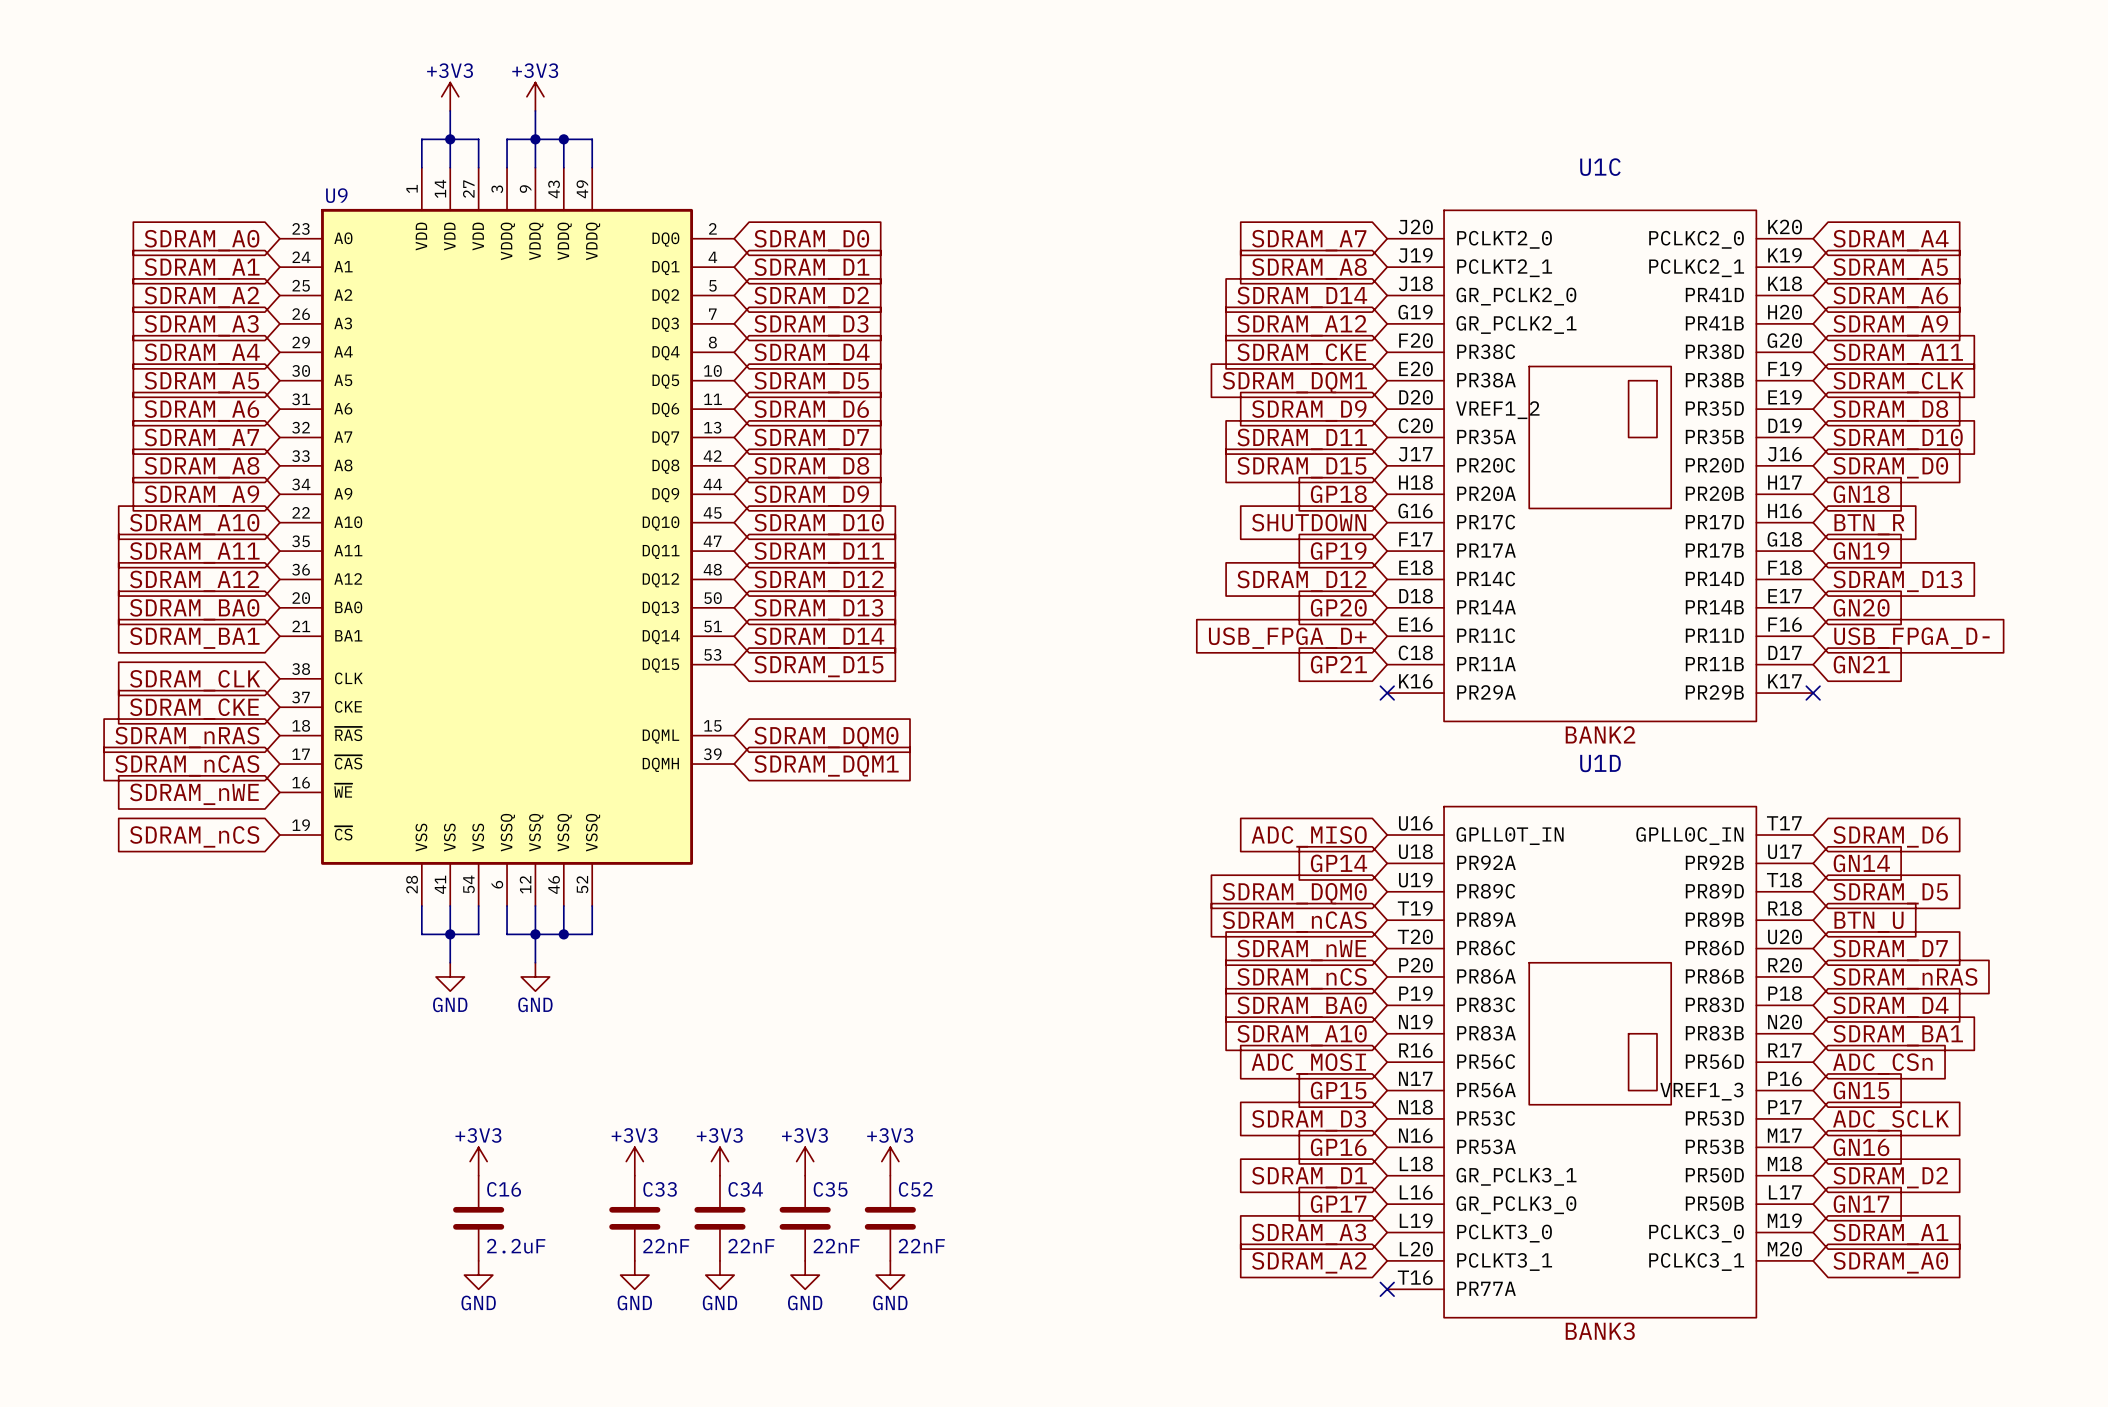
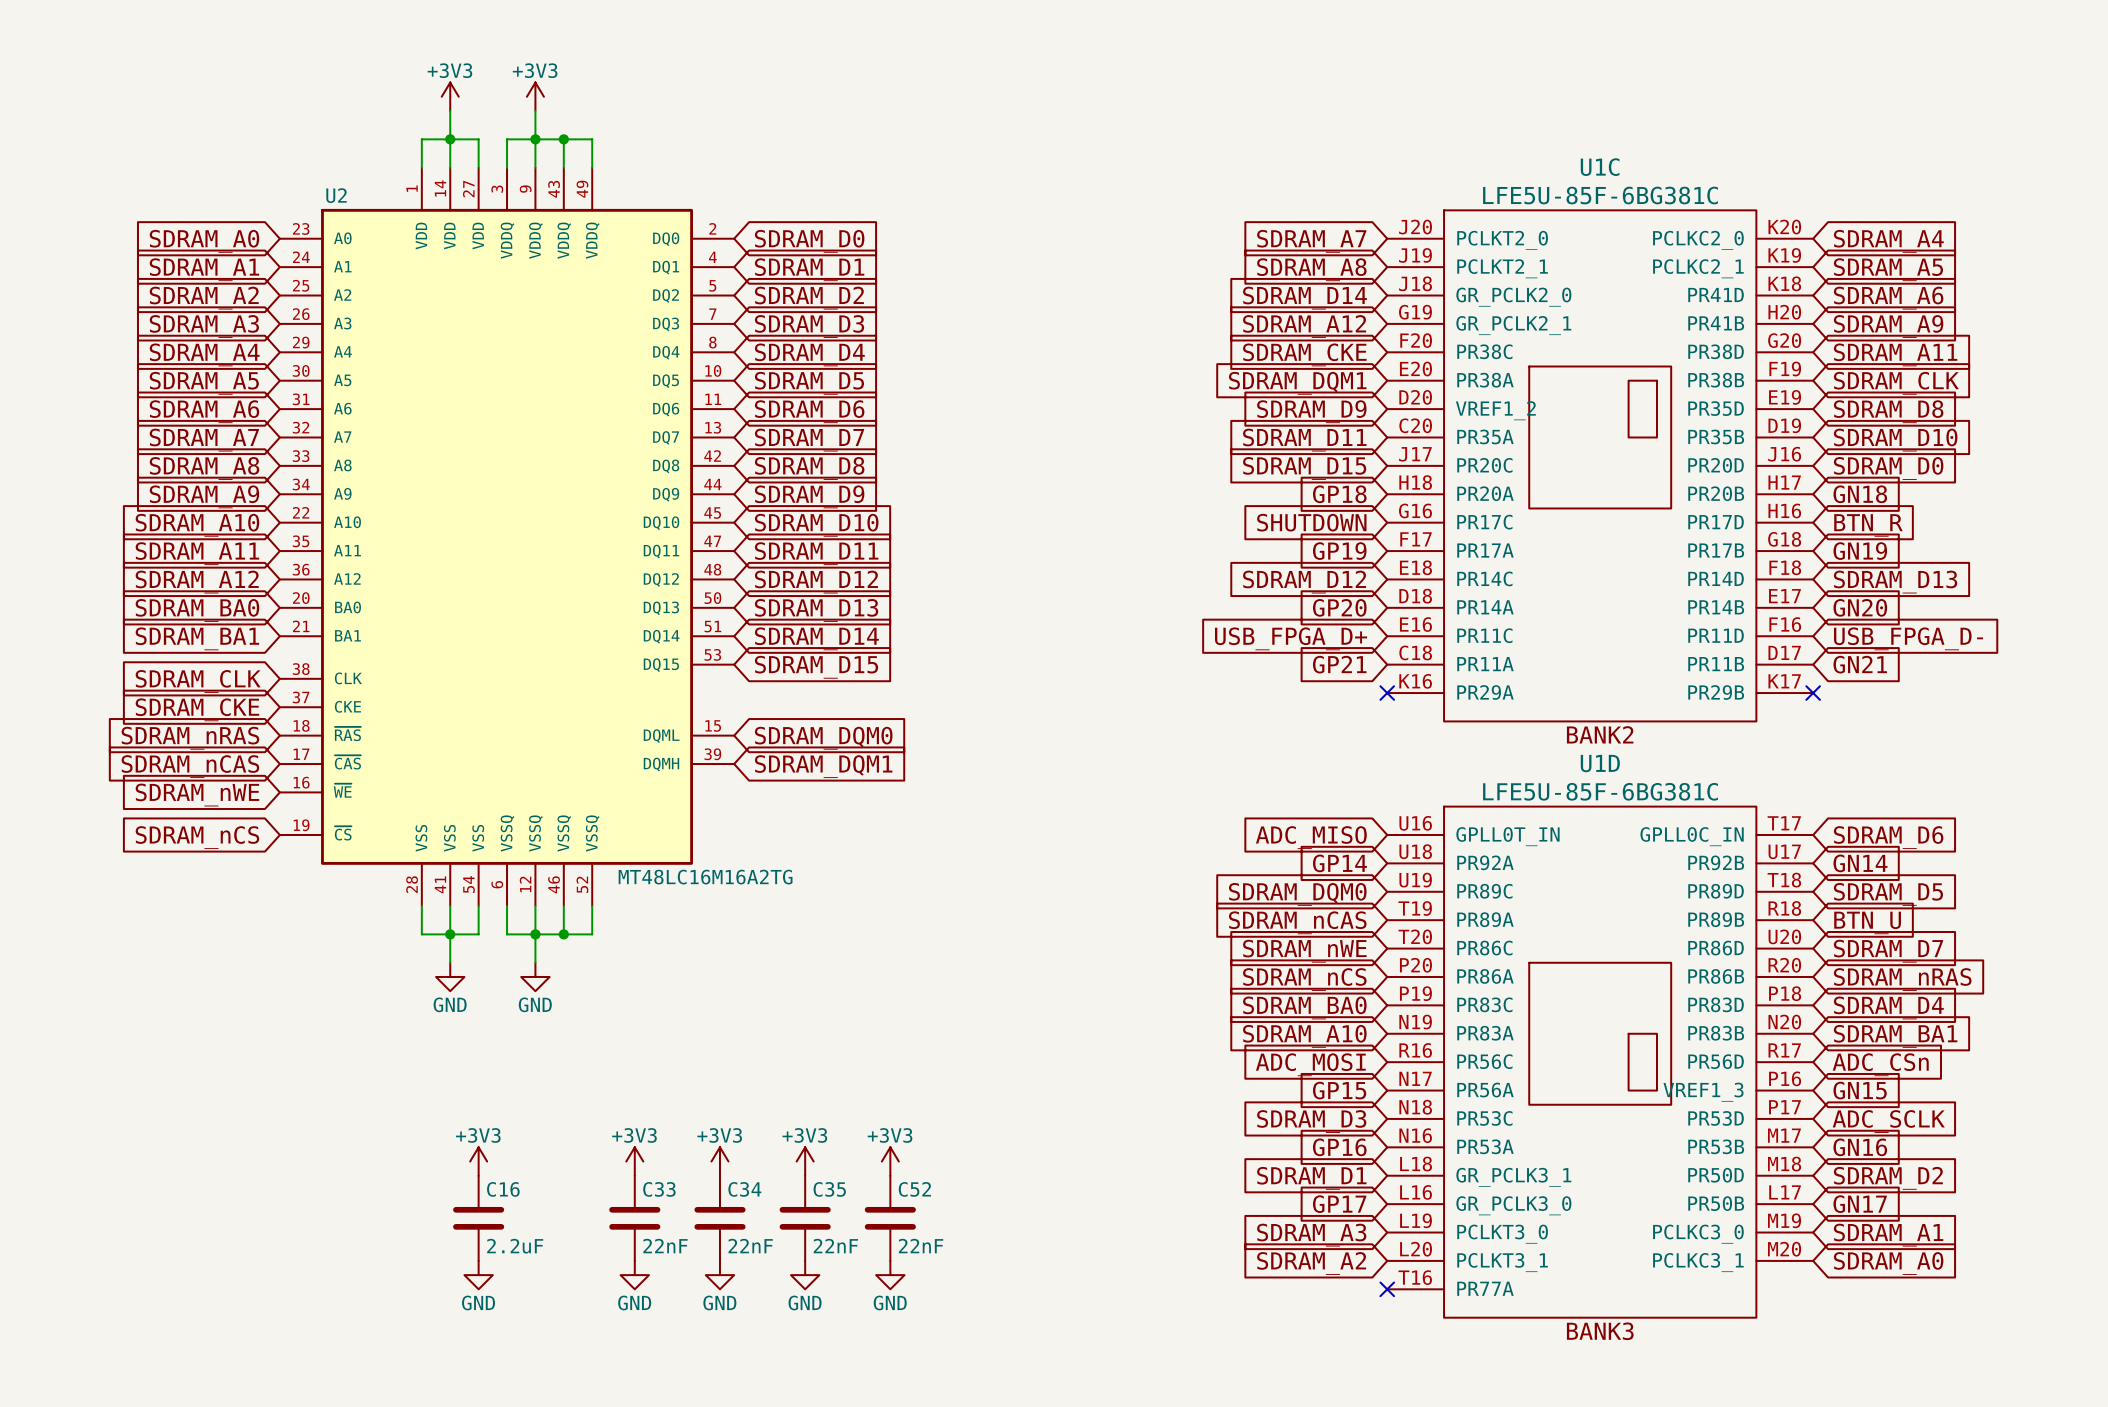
U9 name: U9 (336, 195) -> U2 (336, 195)
U1C value: none -> LFE5U-85F-6BG381C (1600, 195)
U1D value: none -> LFE5U-85F-6BG381C (1600, 791)
U9 value: none -> MT48LC16M16A2TG (705, 877)

